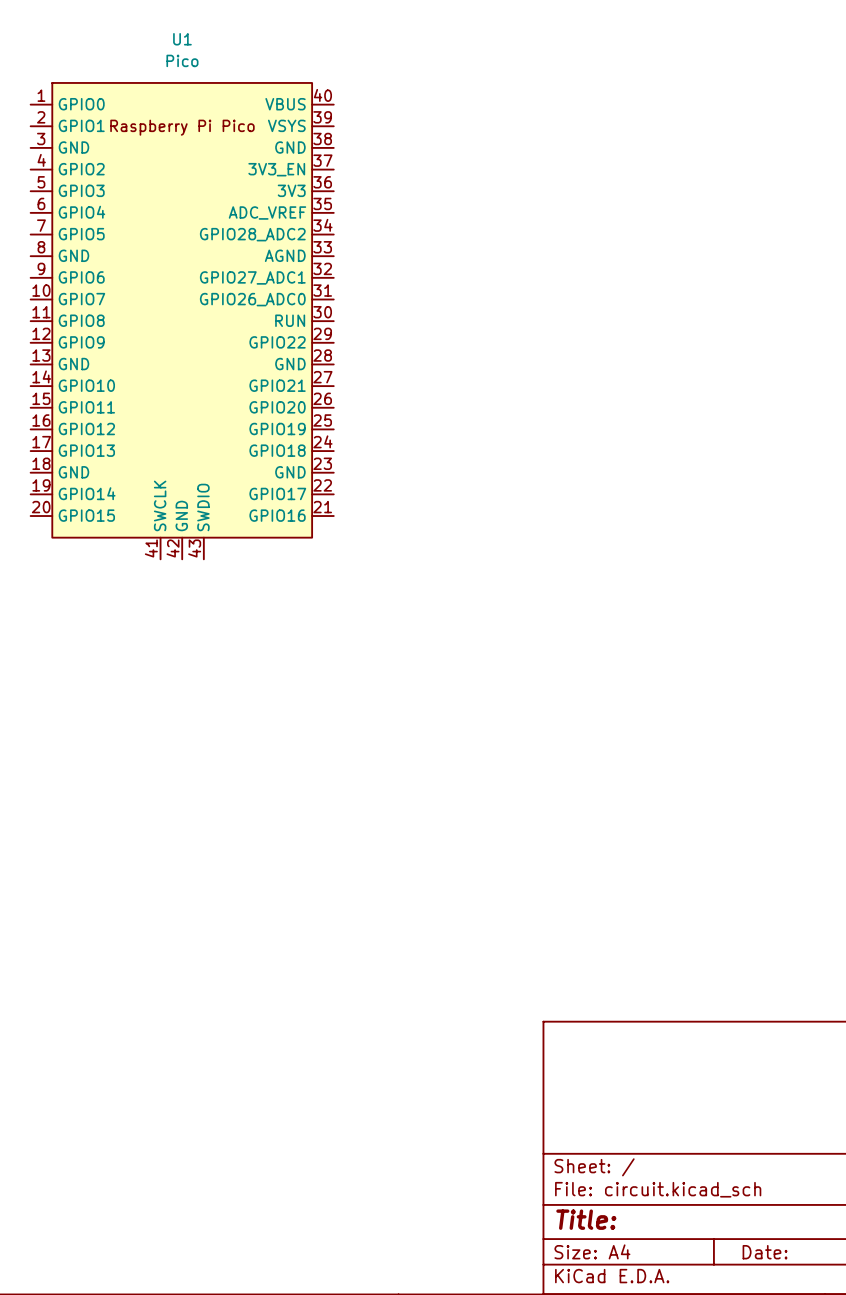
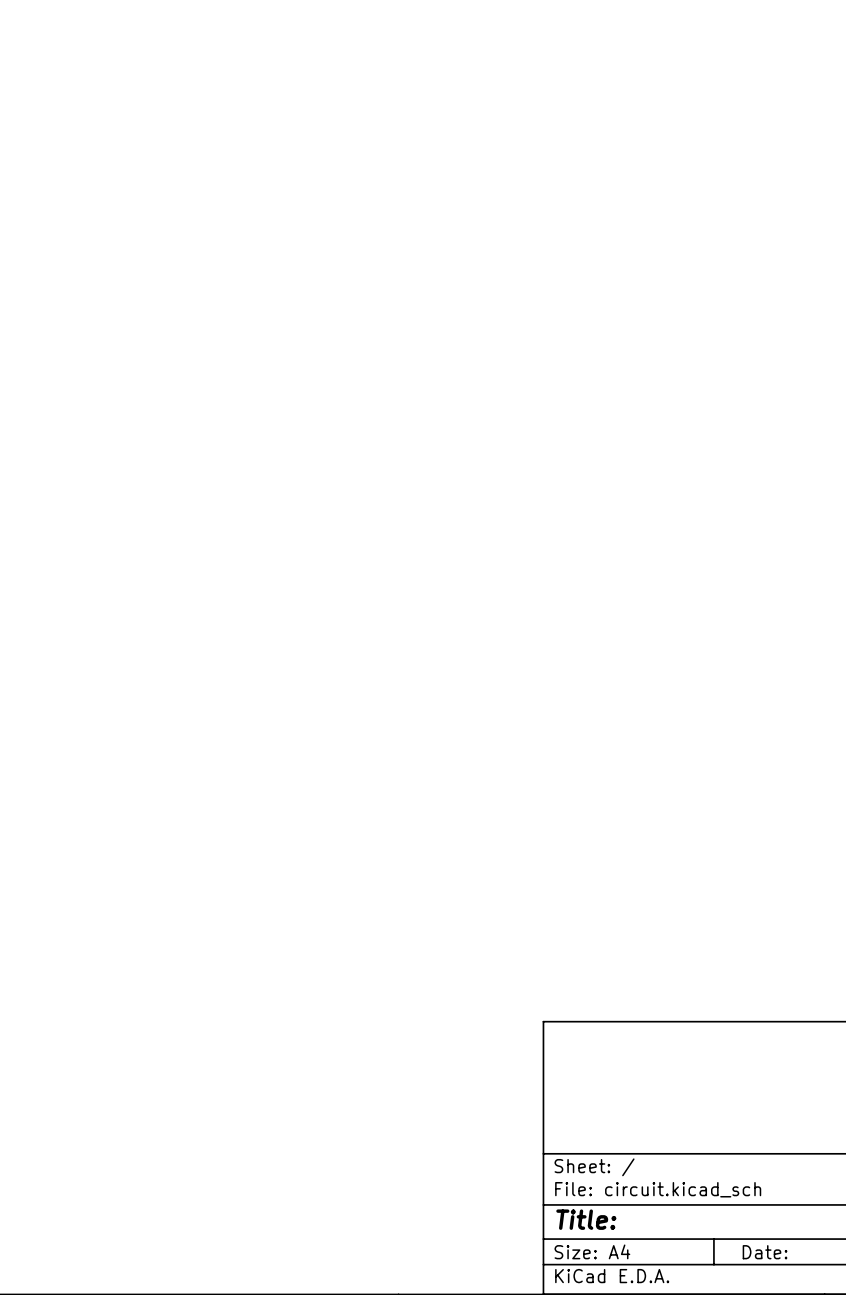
U1: Pico (182, 321) -> none

